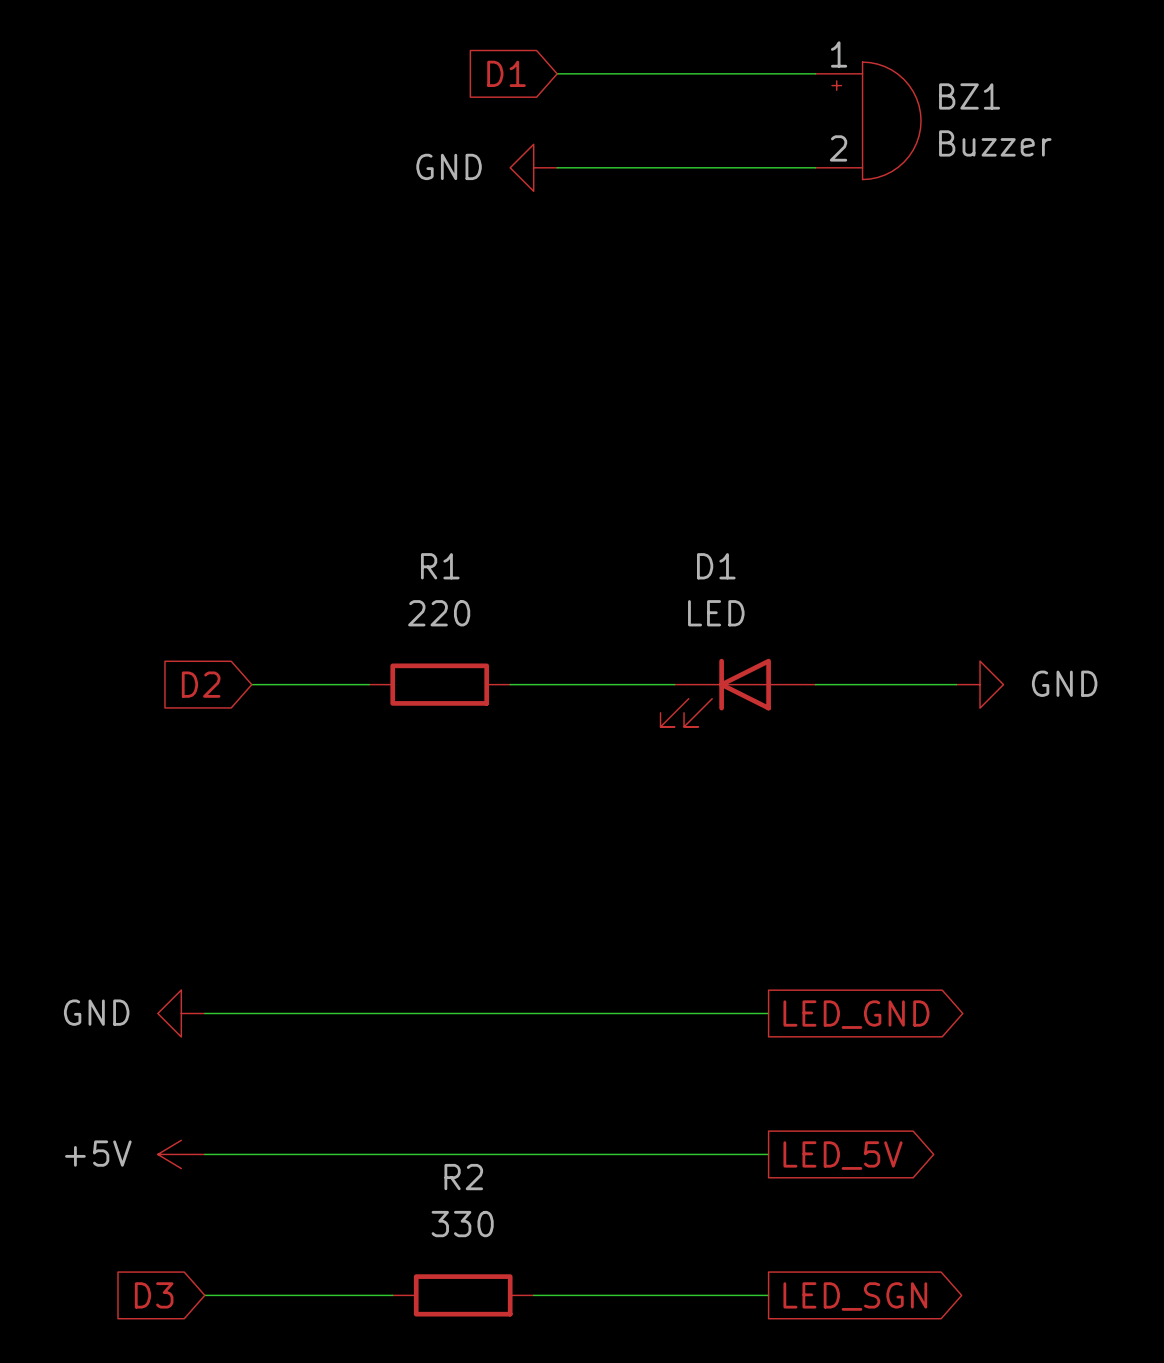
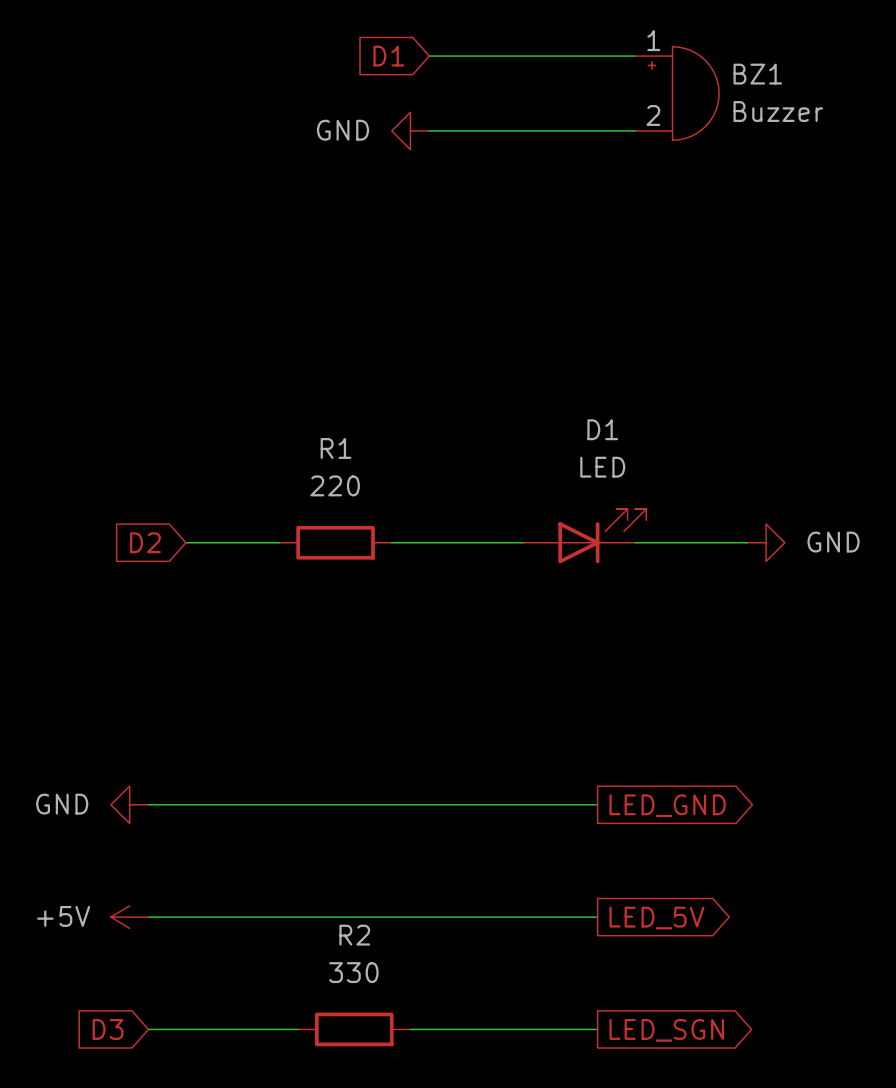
D1 name position: D1 (716, 566) -> D1 (602, 429)
D1 value position: LED (716, 613) -> LED (602, 467)
D1 rotation: 0° (715, 692) -> 180° (602, 536)

